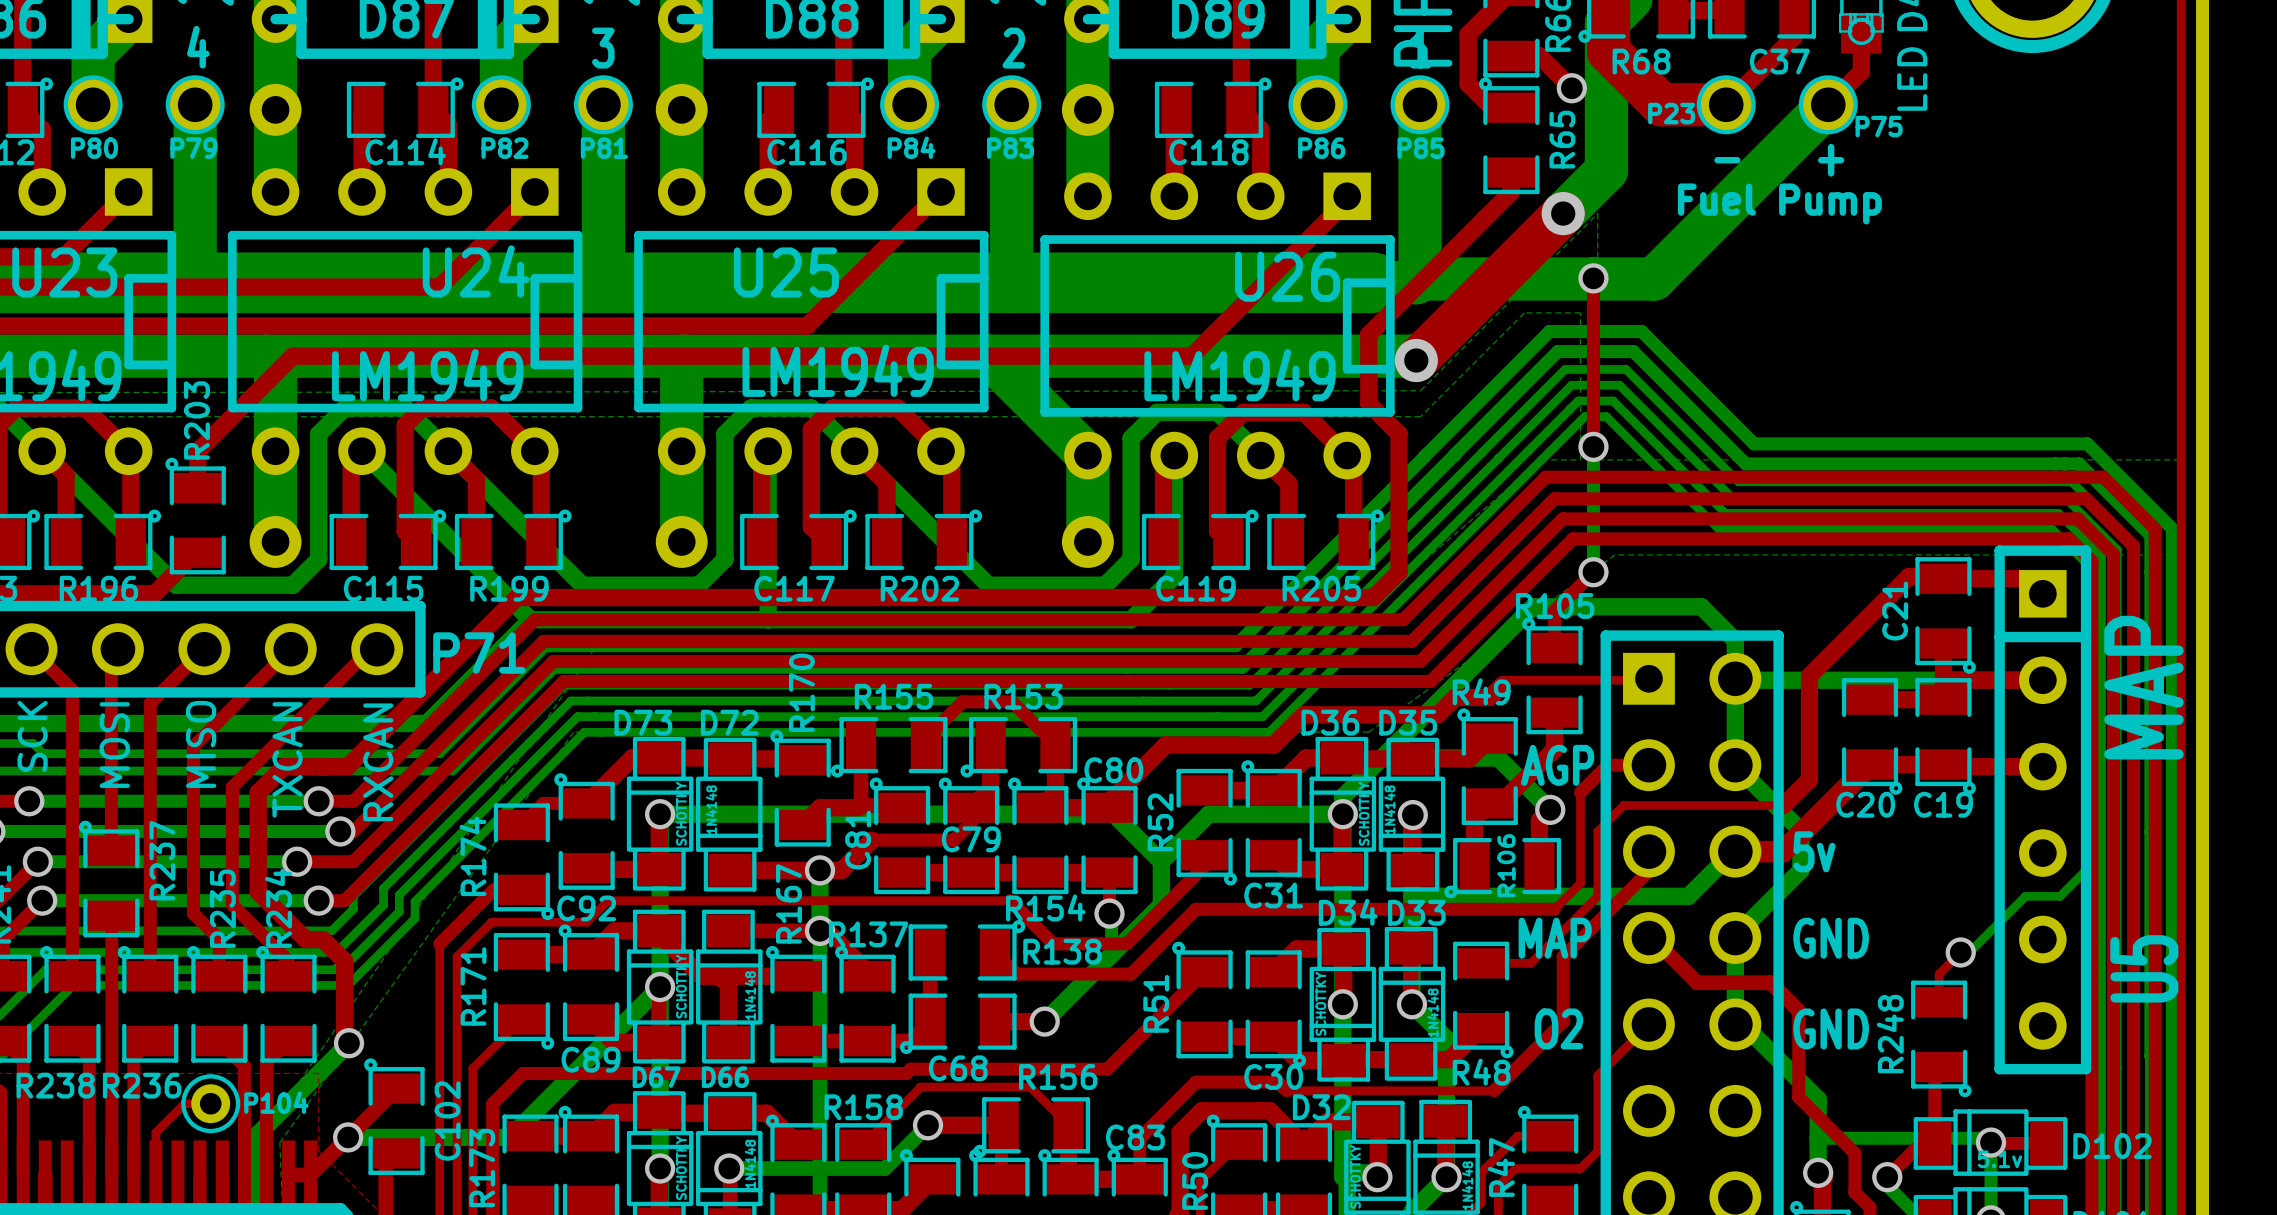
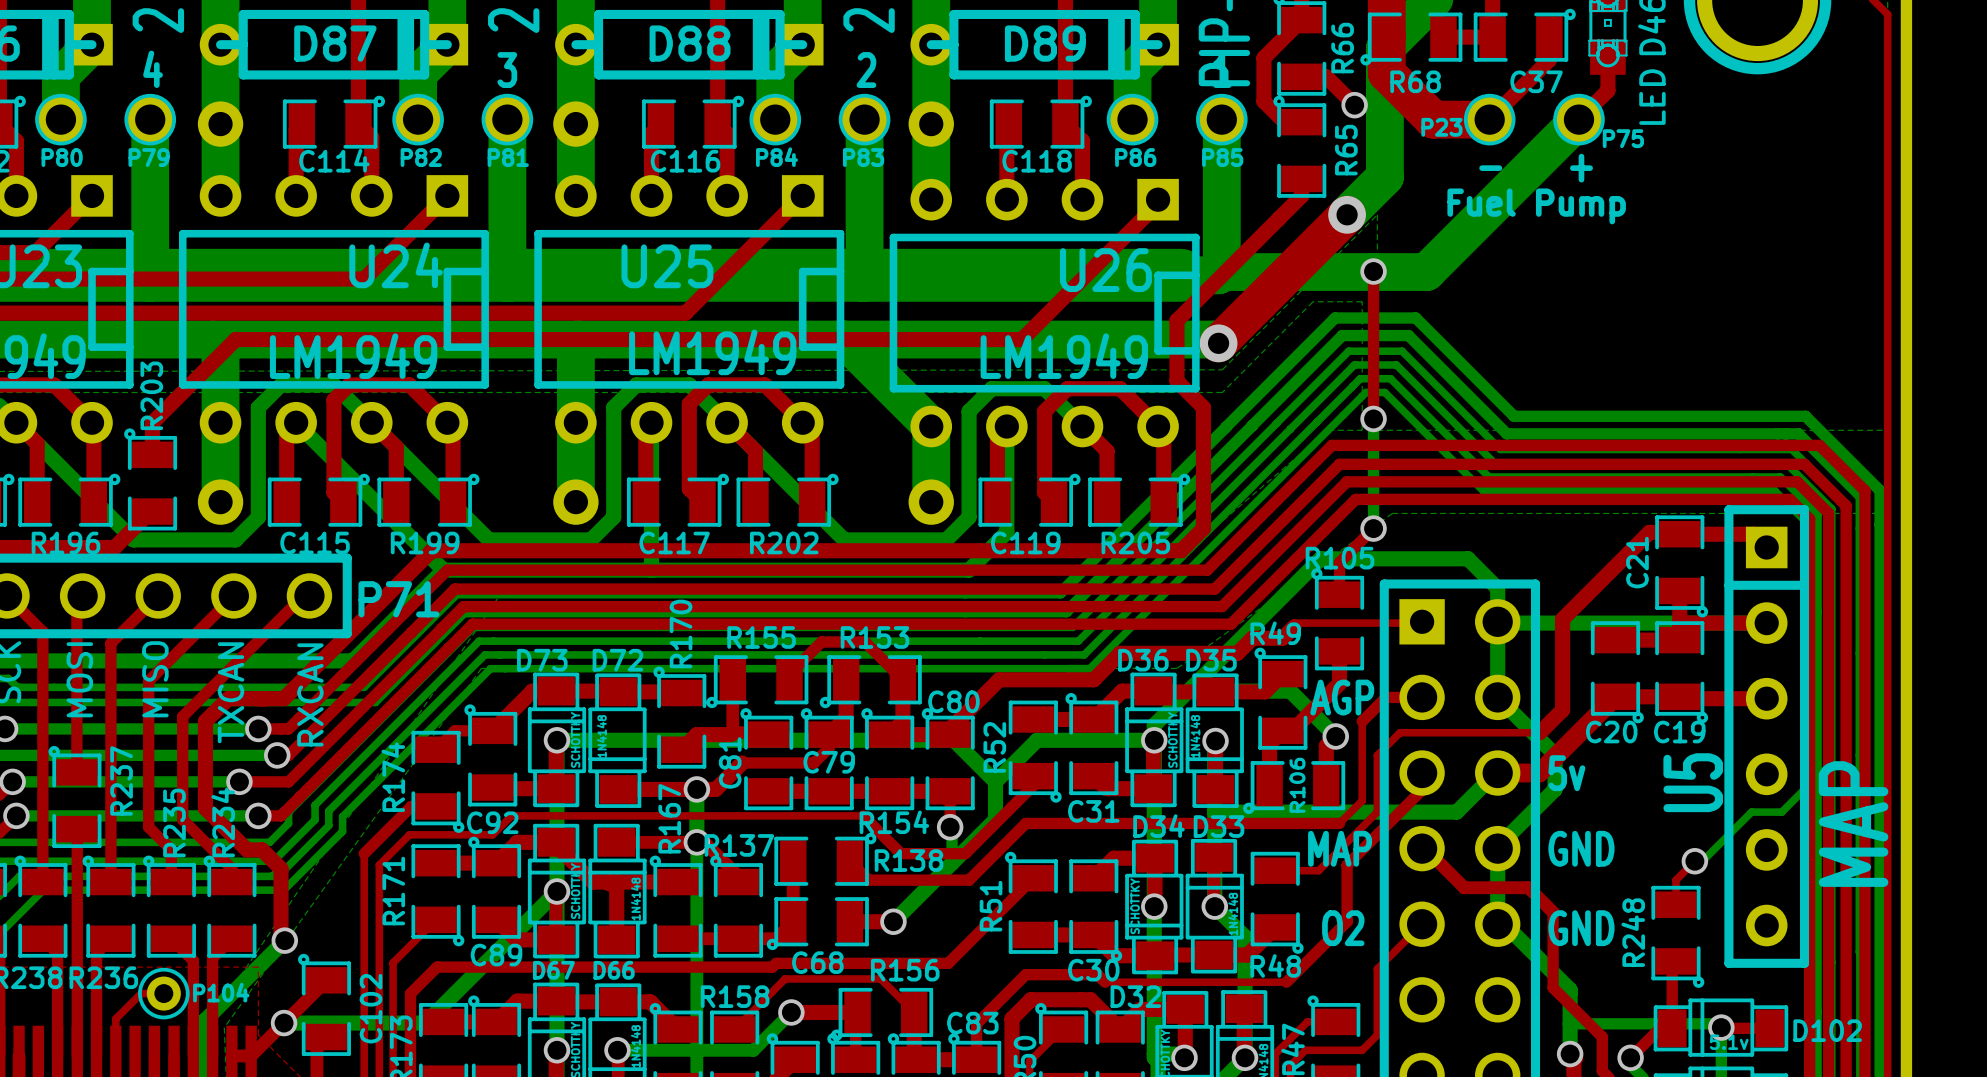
text position: MAP (2143, 687) -> MAP (1853, 824)
U5 name position: U5 (2144, 968) -> U5 (1693, 782)

